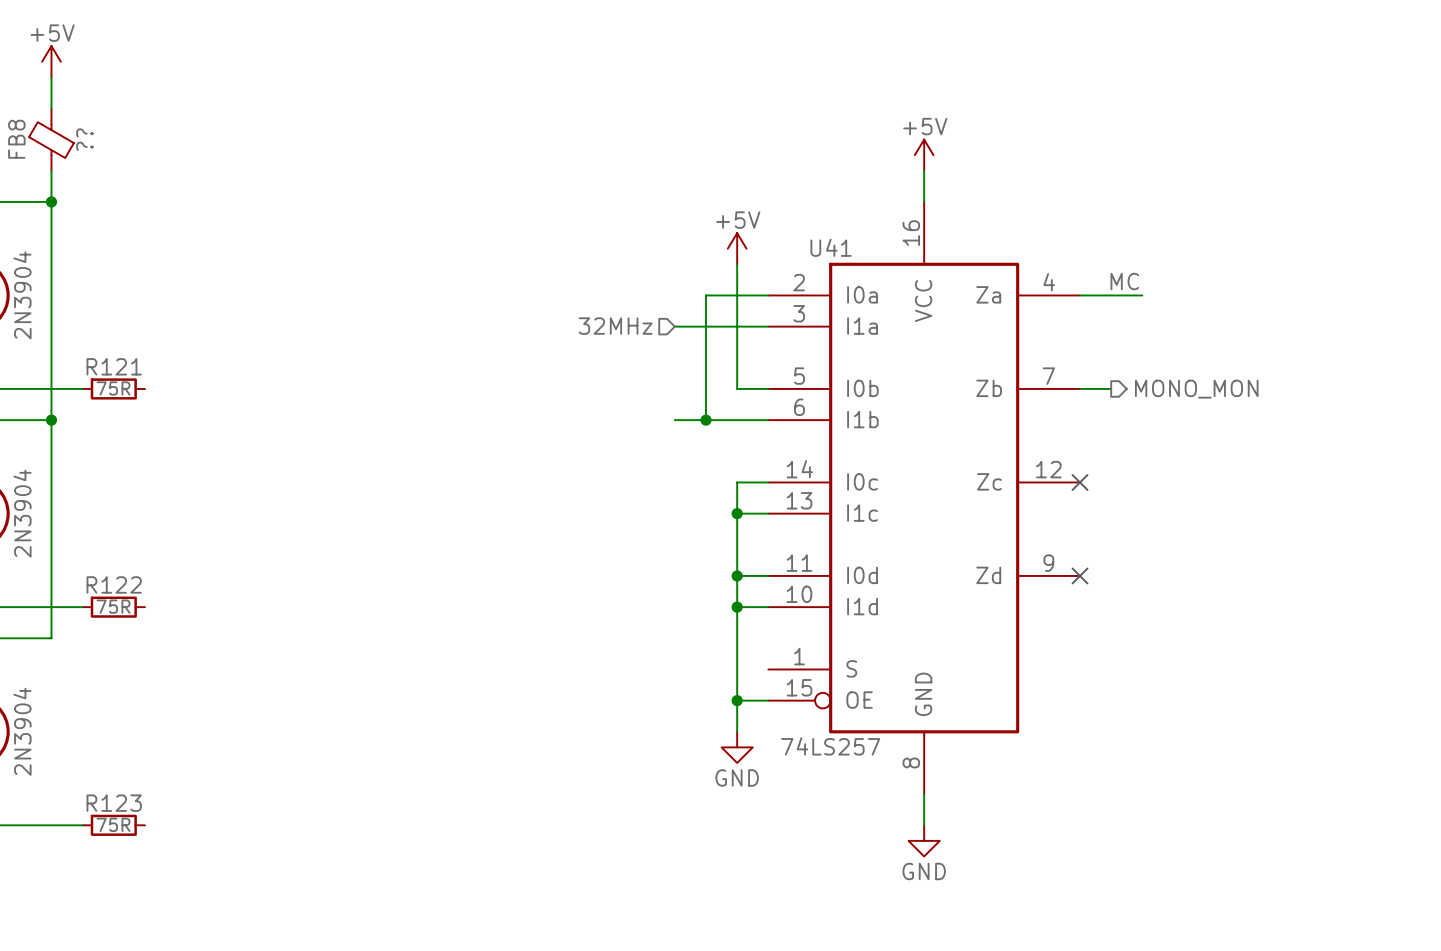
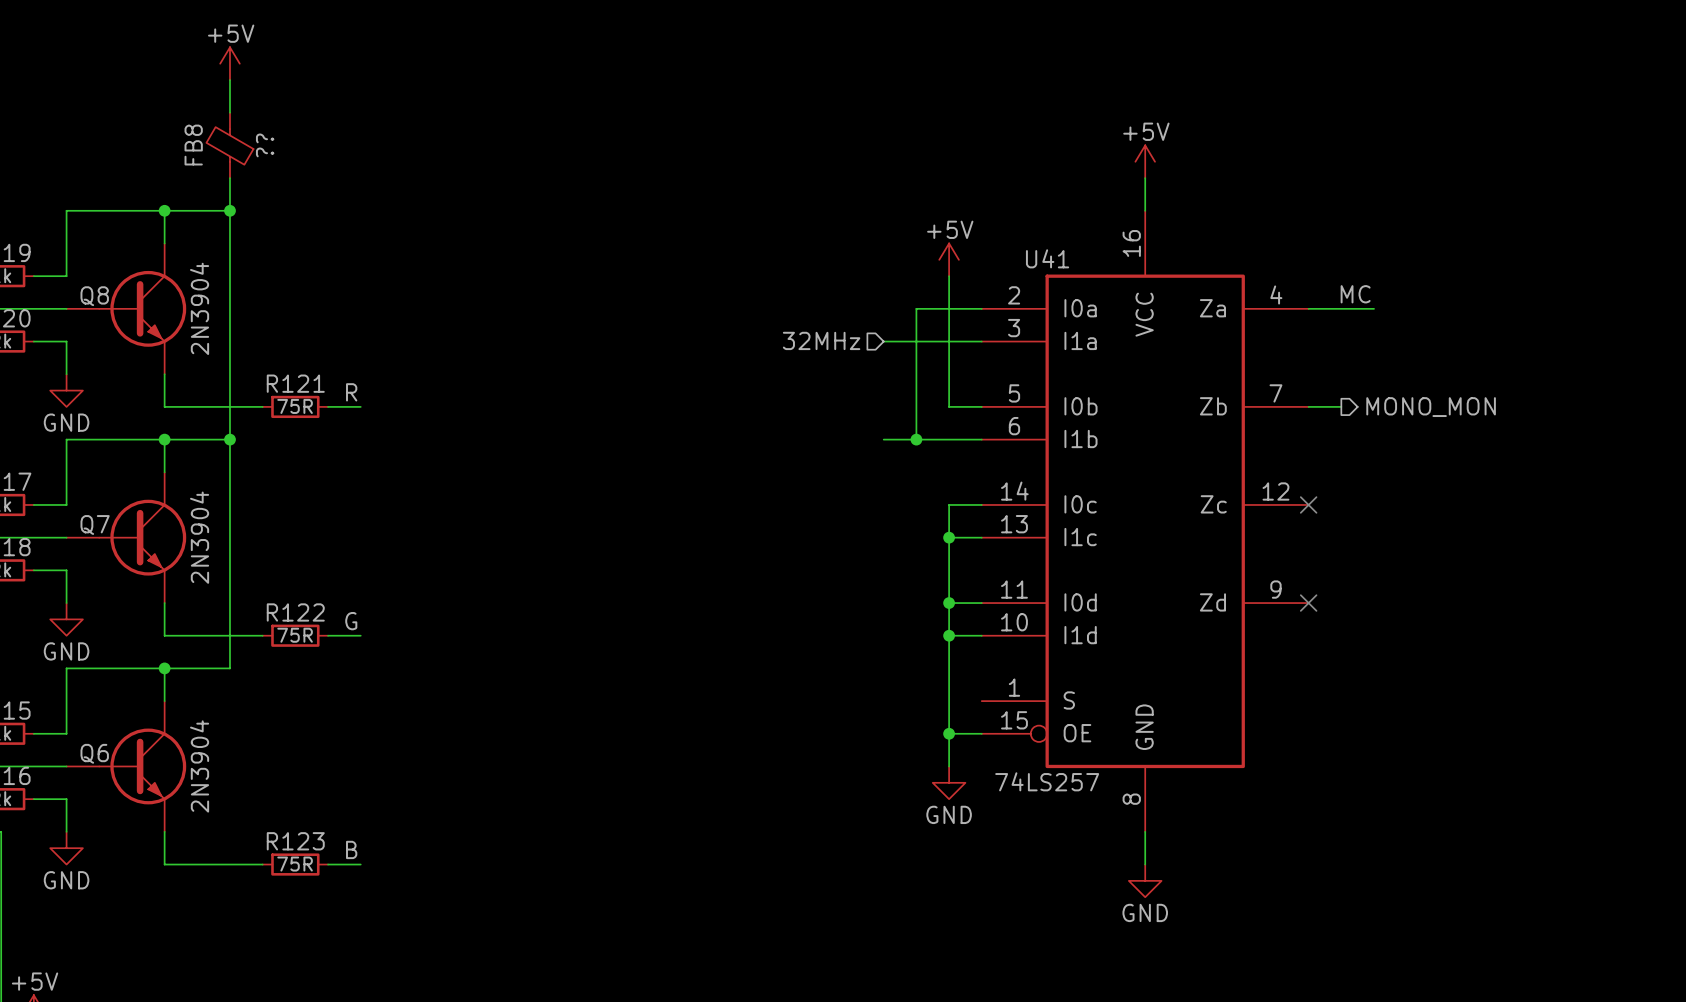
label: none -> R (351, 392)
wire: none -> (328, 406) (360, 406)
label: none -> G (351, 621)
wire: none -> (328, 635) (360, 635)
label: none -> B (351, 849)
wire: none -> (328, 864) (360, 864)

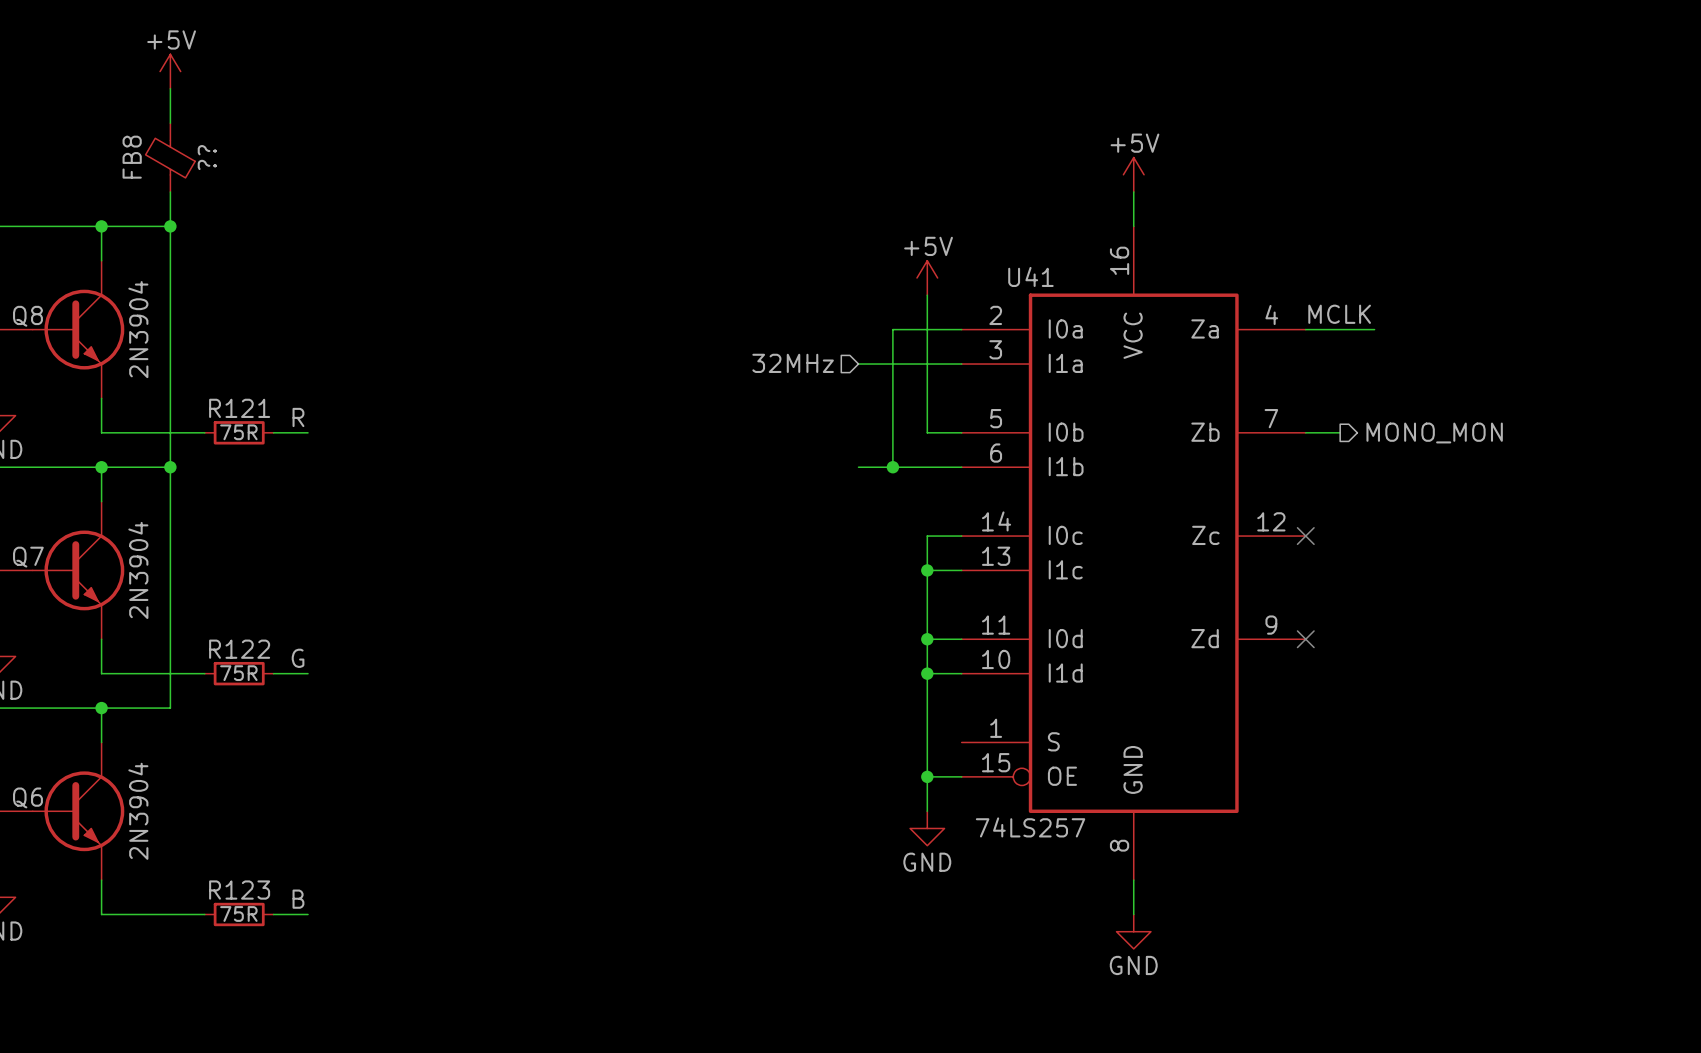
label: MC (1355, 294) -> MCLK (1339, 314)

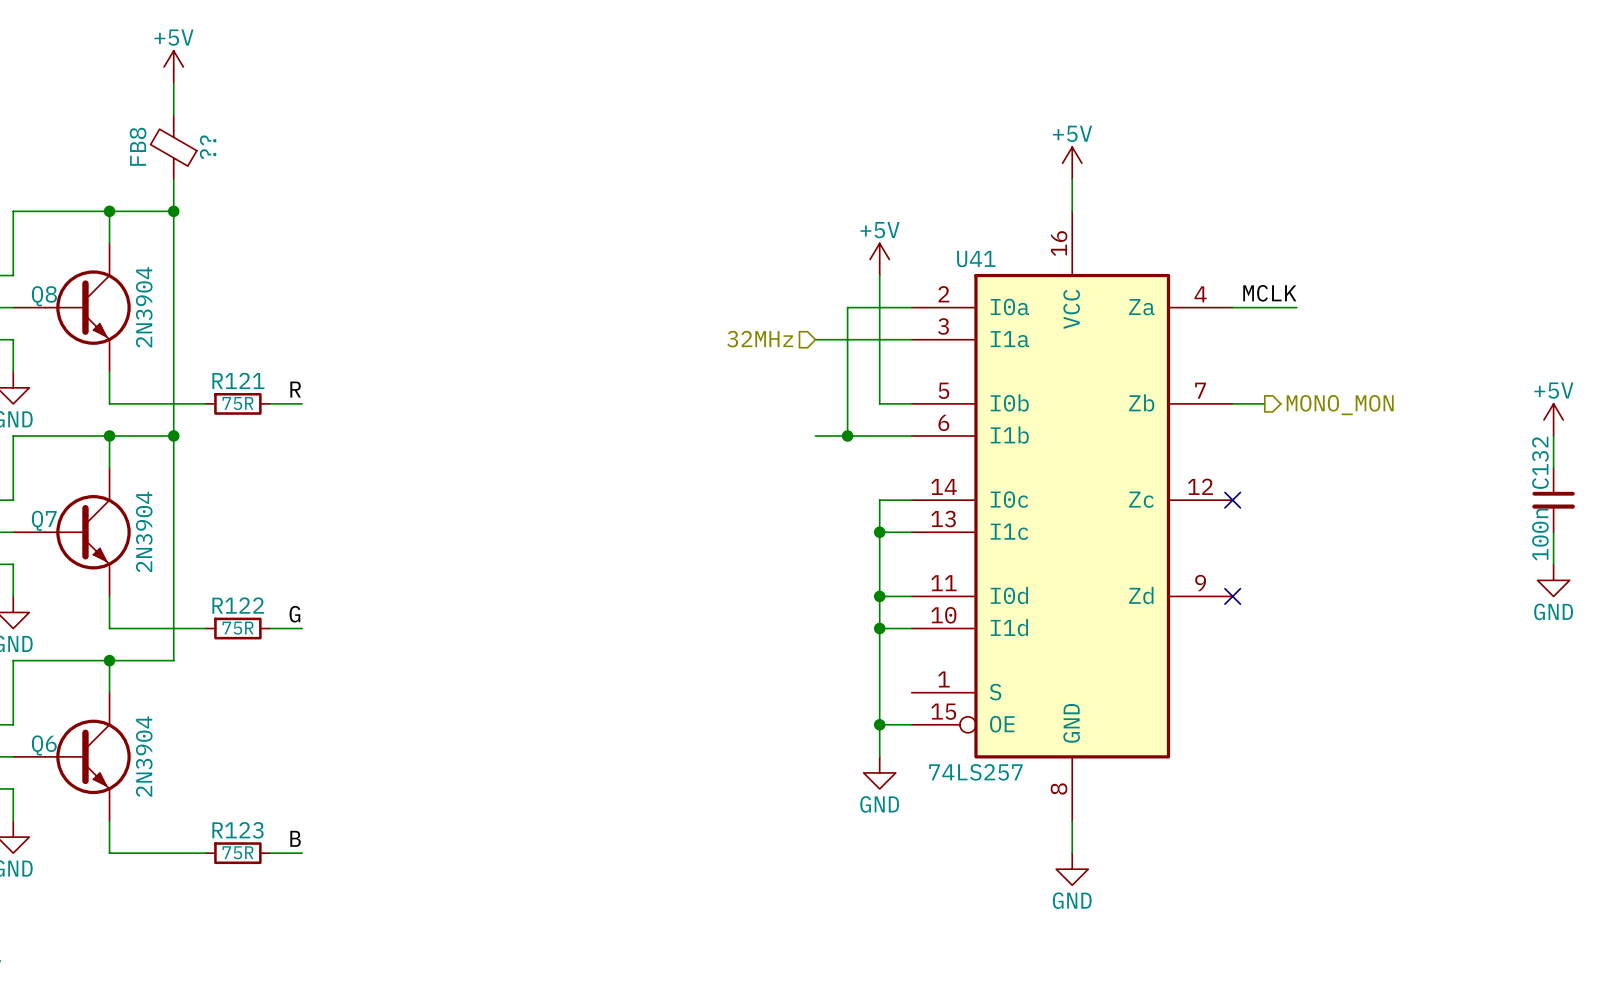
power symbol: none -> +5V (1553, 419)
wire: none -> (1553, 435) (1553, 468)
C132: none -> 100n (1553, 500)
wire: none -> (1553, 532) (1553, 564)
power symbol: none -> GND (1553, 580)

